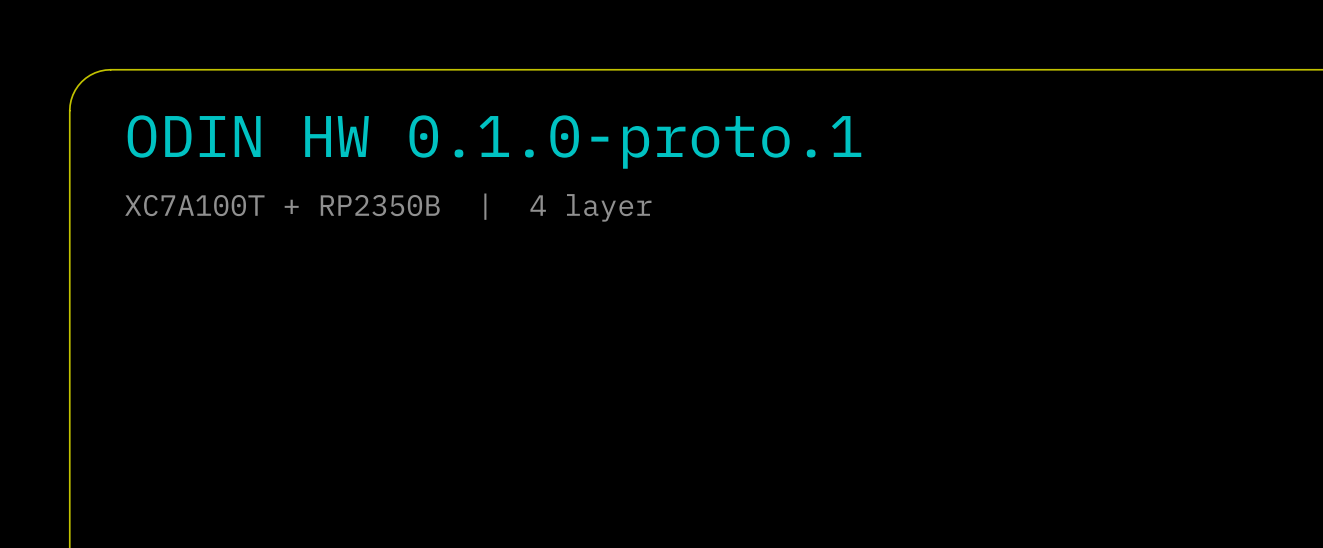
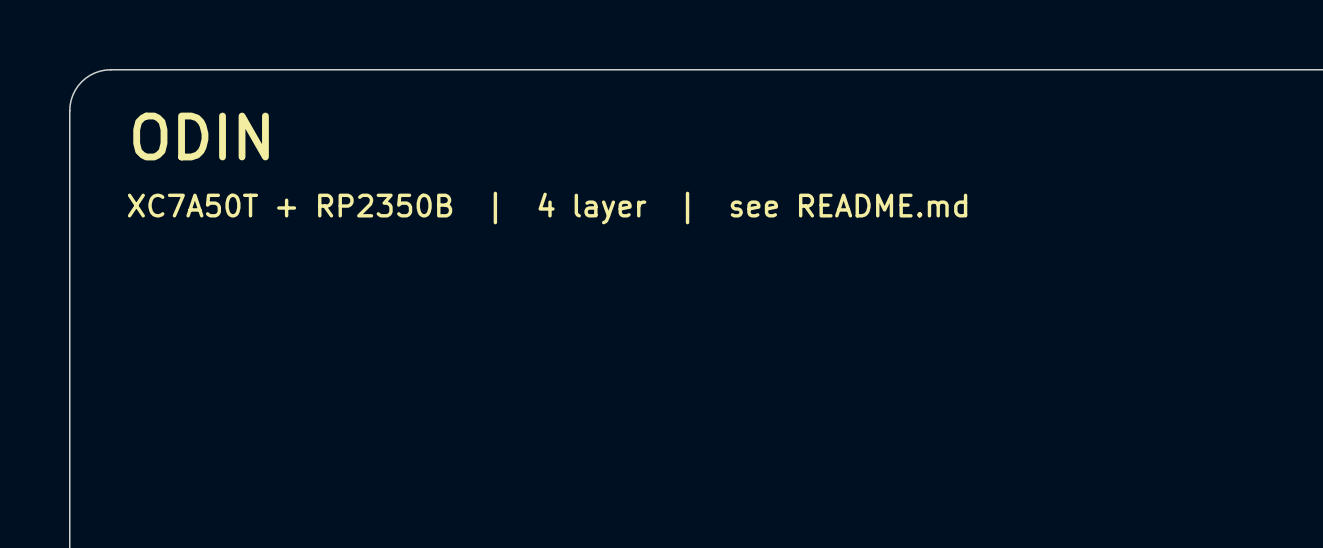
text: ODIN HW 0.1.0-proto.1 (494, 142) -> ODIN (201, 136)
text: XC7A100T + RP2350B | 4 layer (388, 207) -> XC7A50T + RP2350B | 4 layer | see README.md (547, 208)

